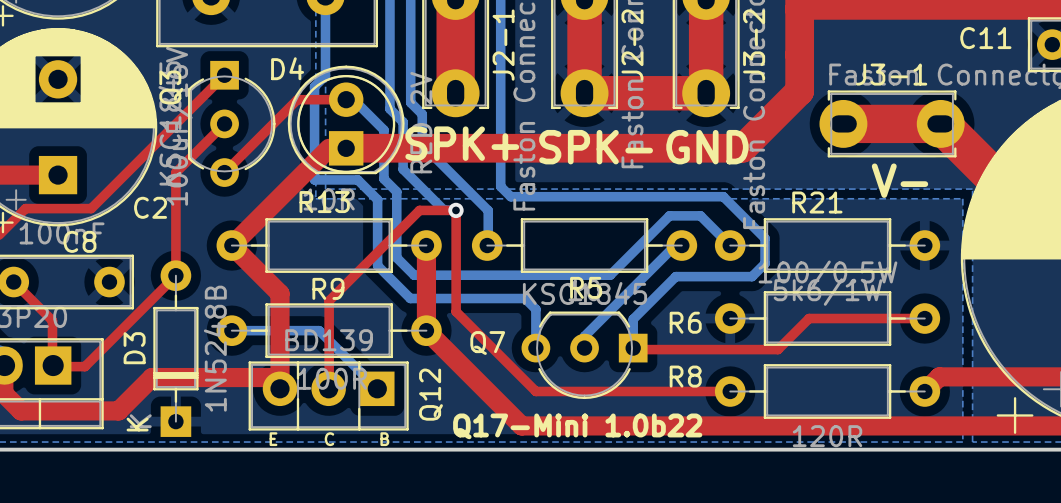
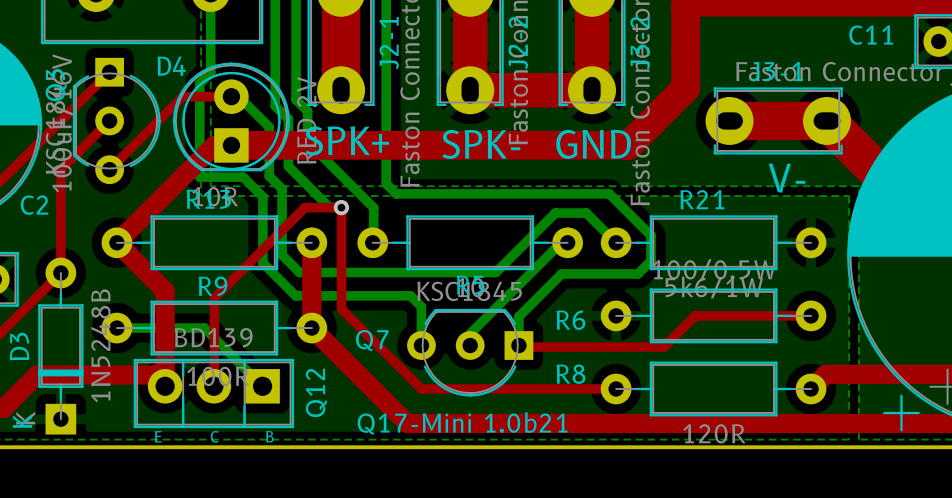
text: Q17-Mini 1.0b22 (577, 426) -> Q17-Mini 1.0b21 (462, 423)

